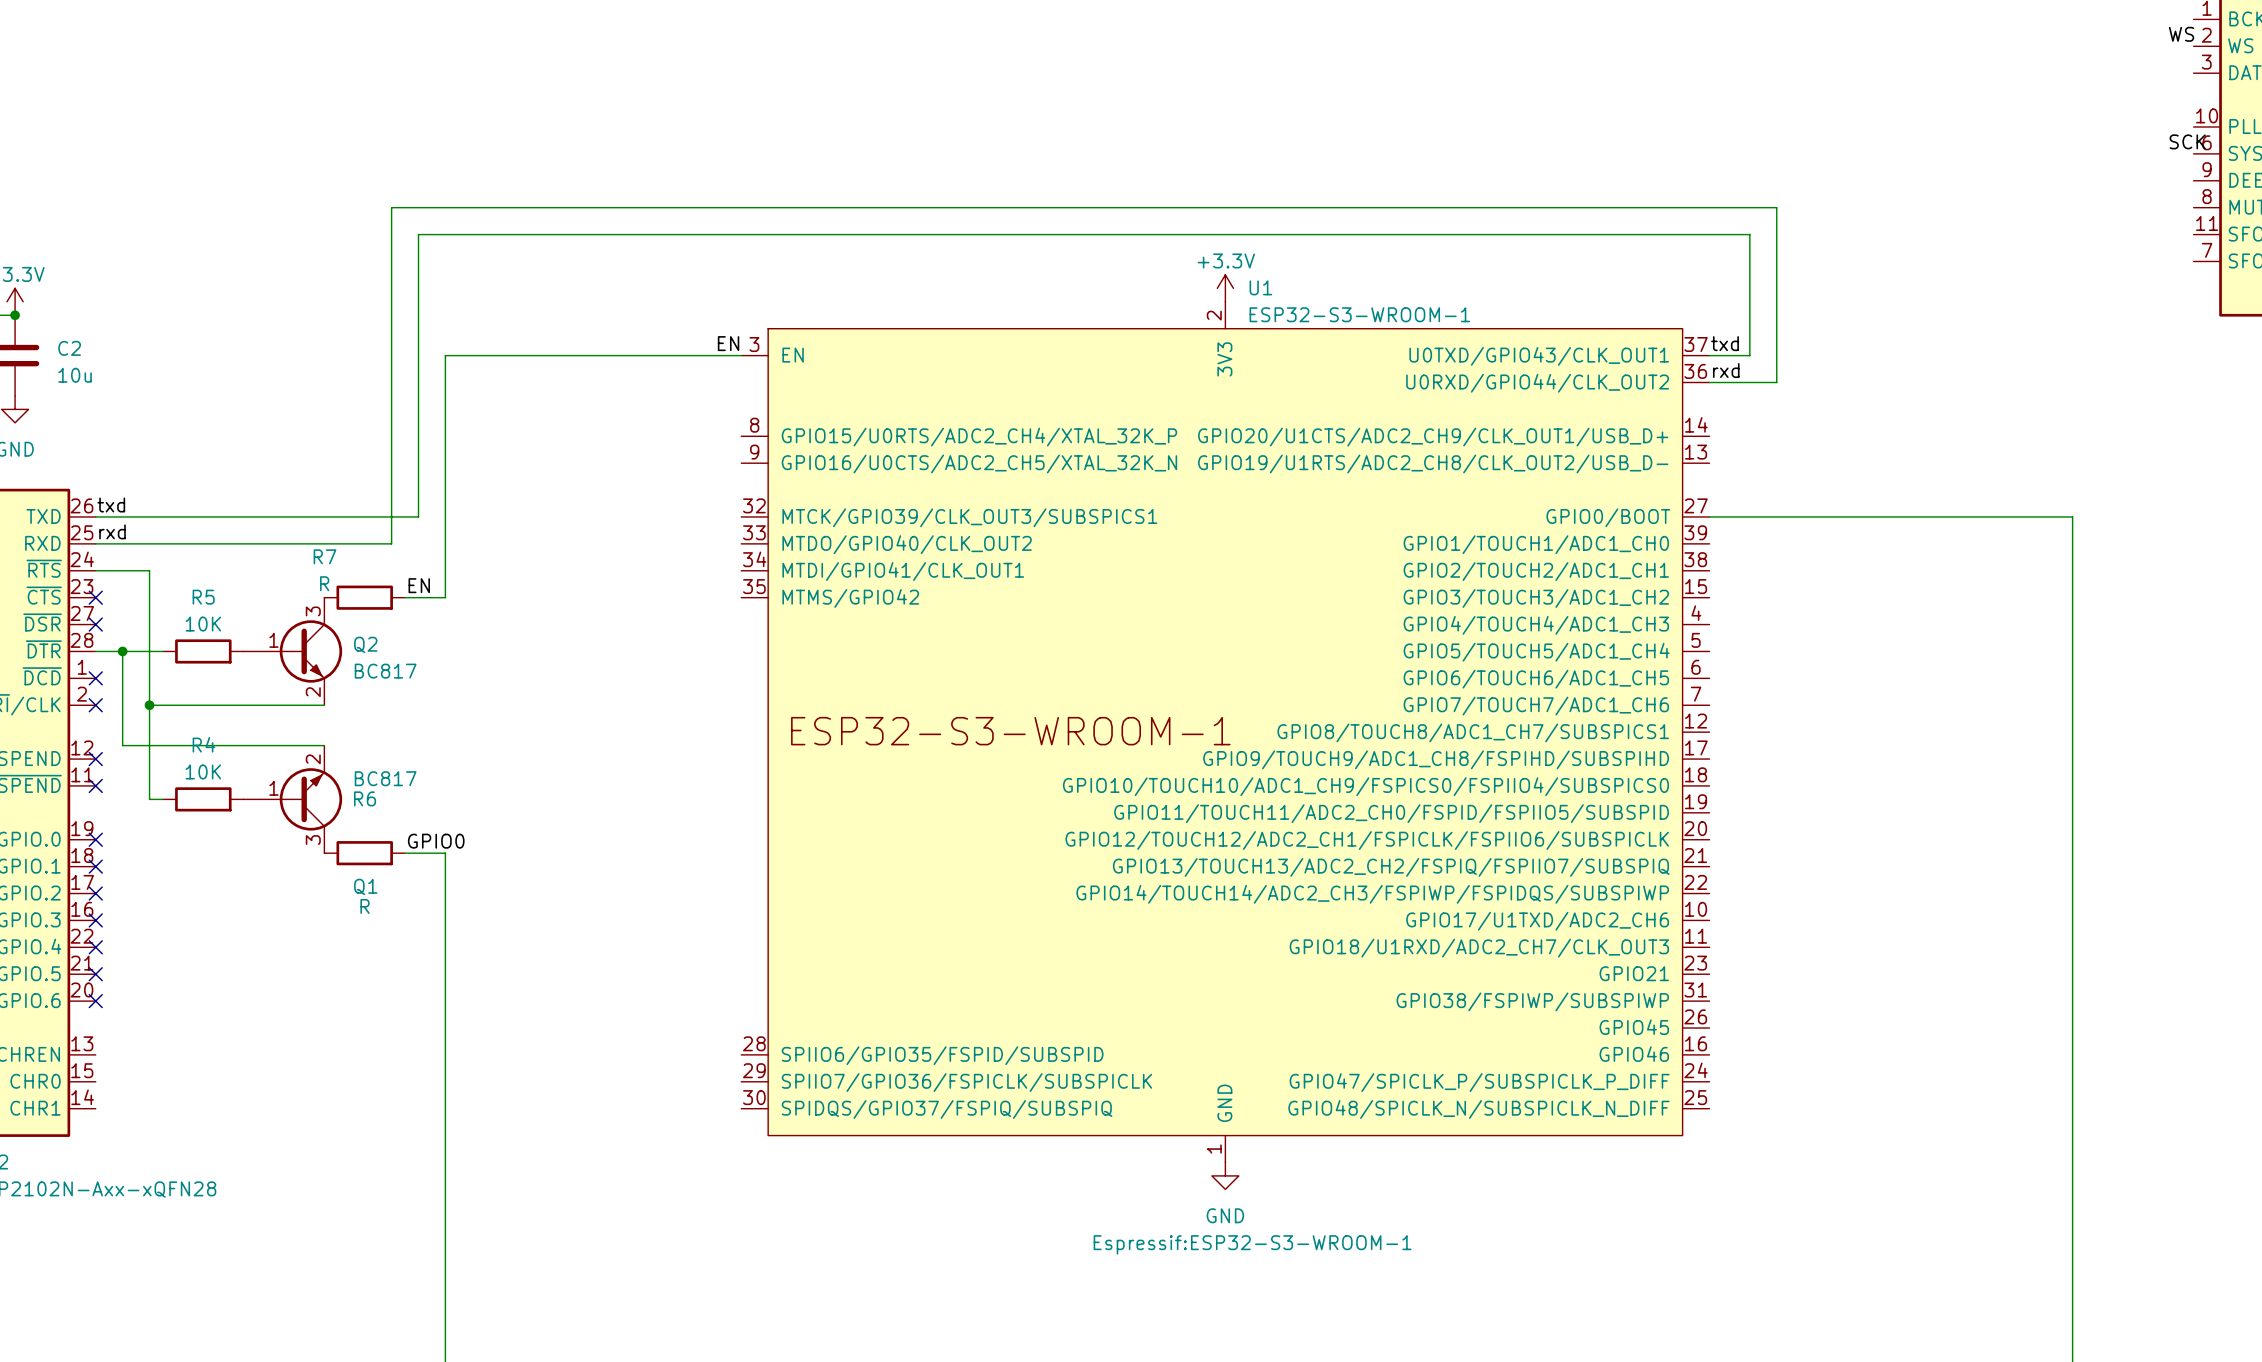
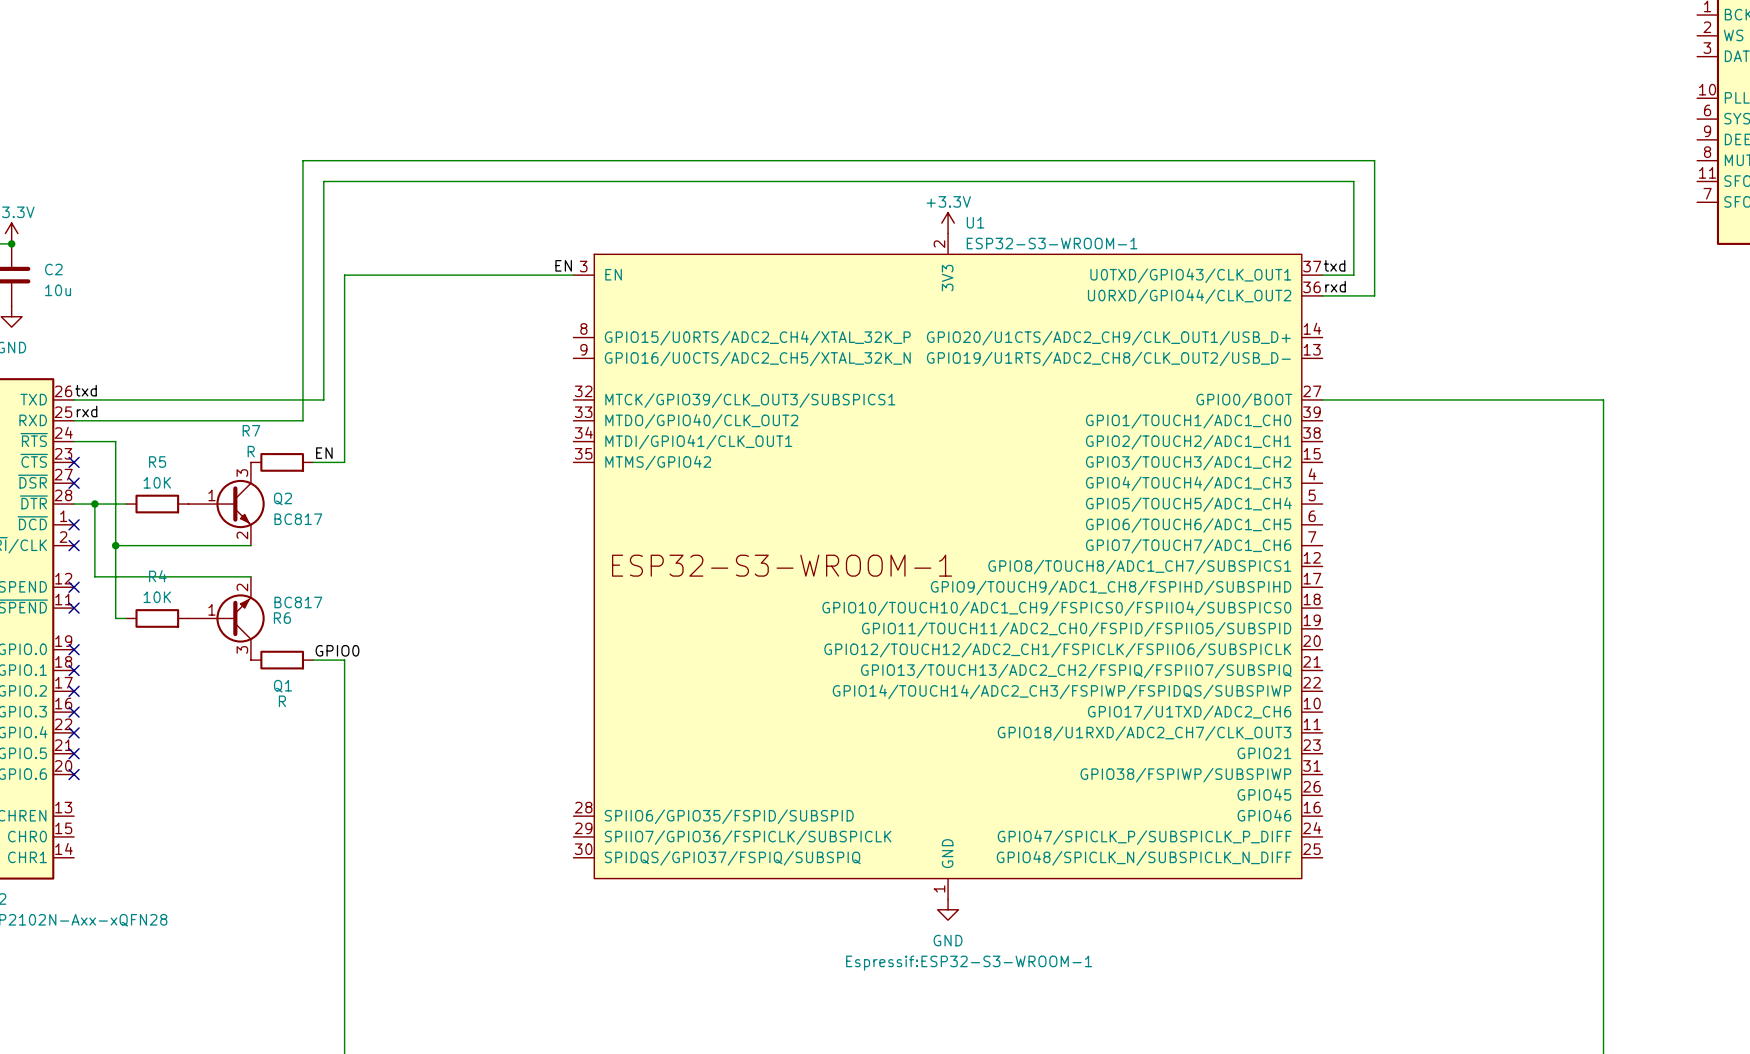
label: WS (2181, 34) -> none
label: SCK (2187, 141) -> none

